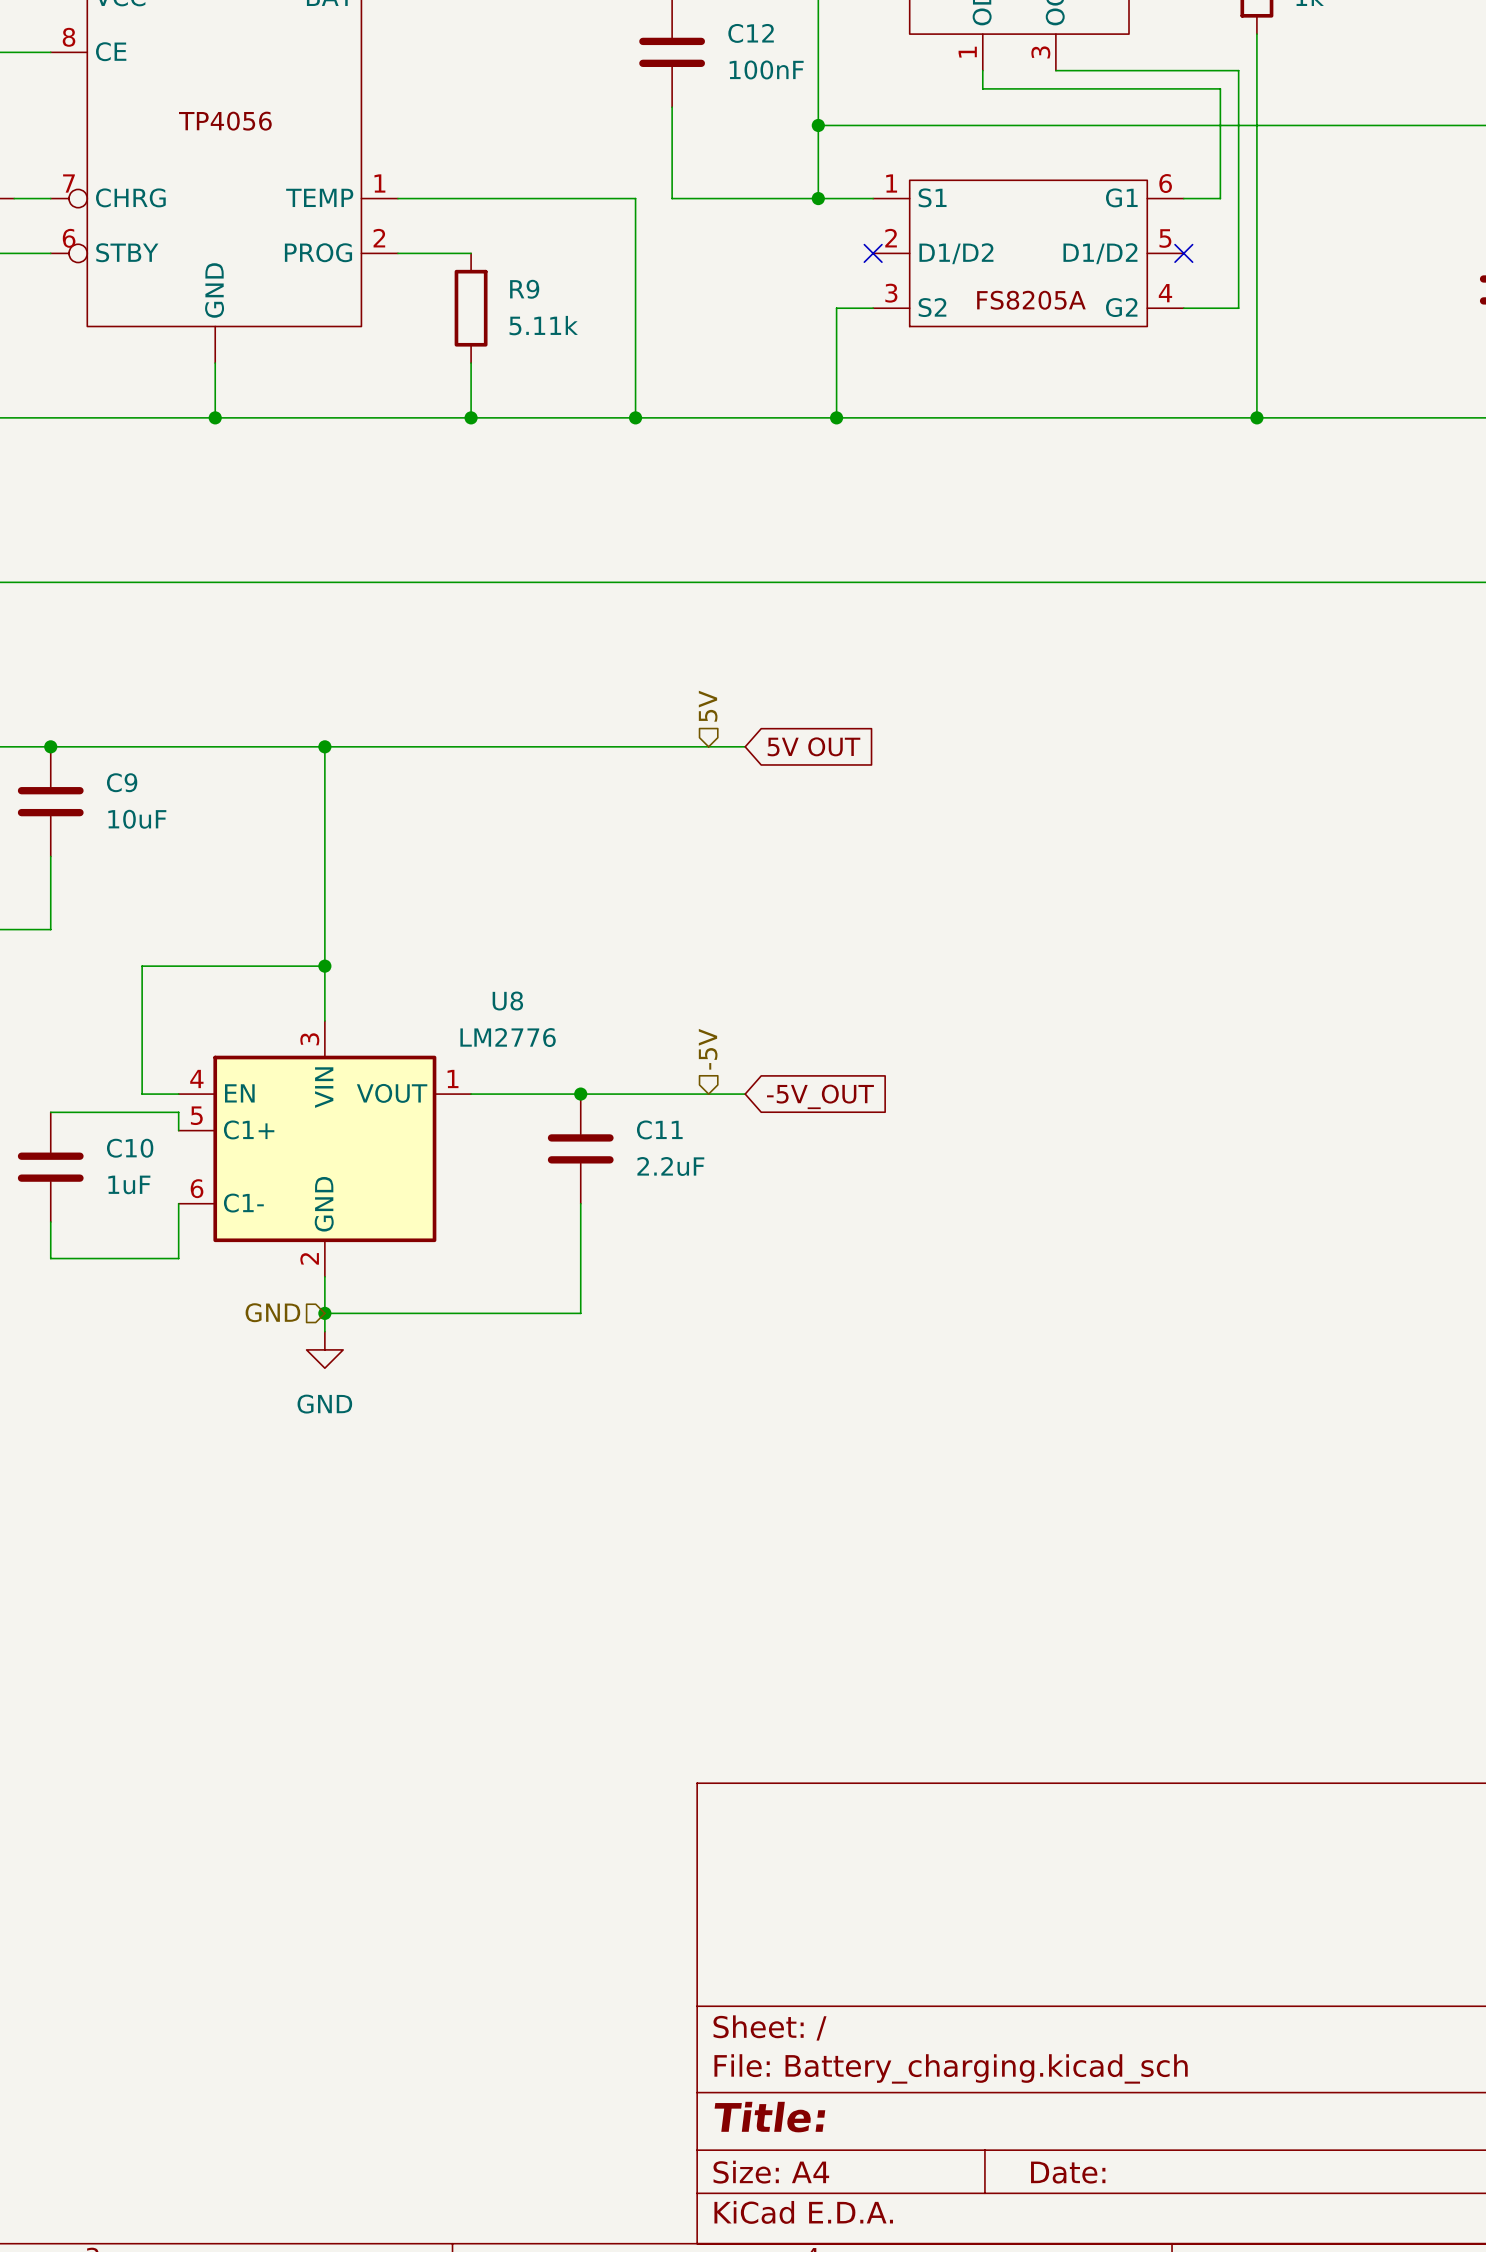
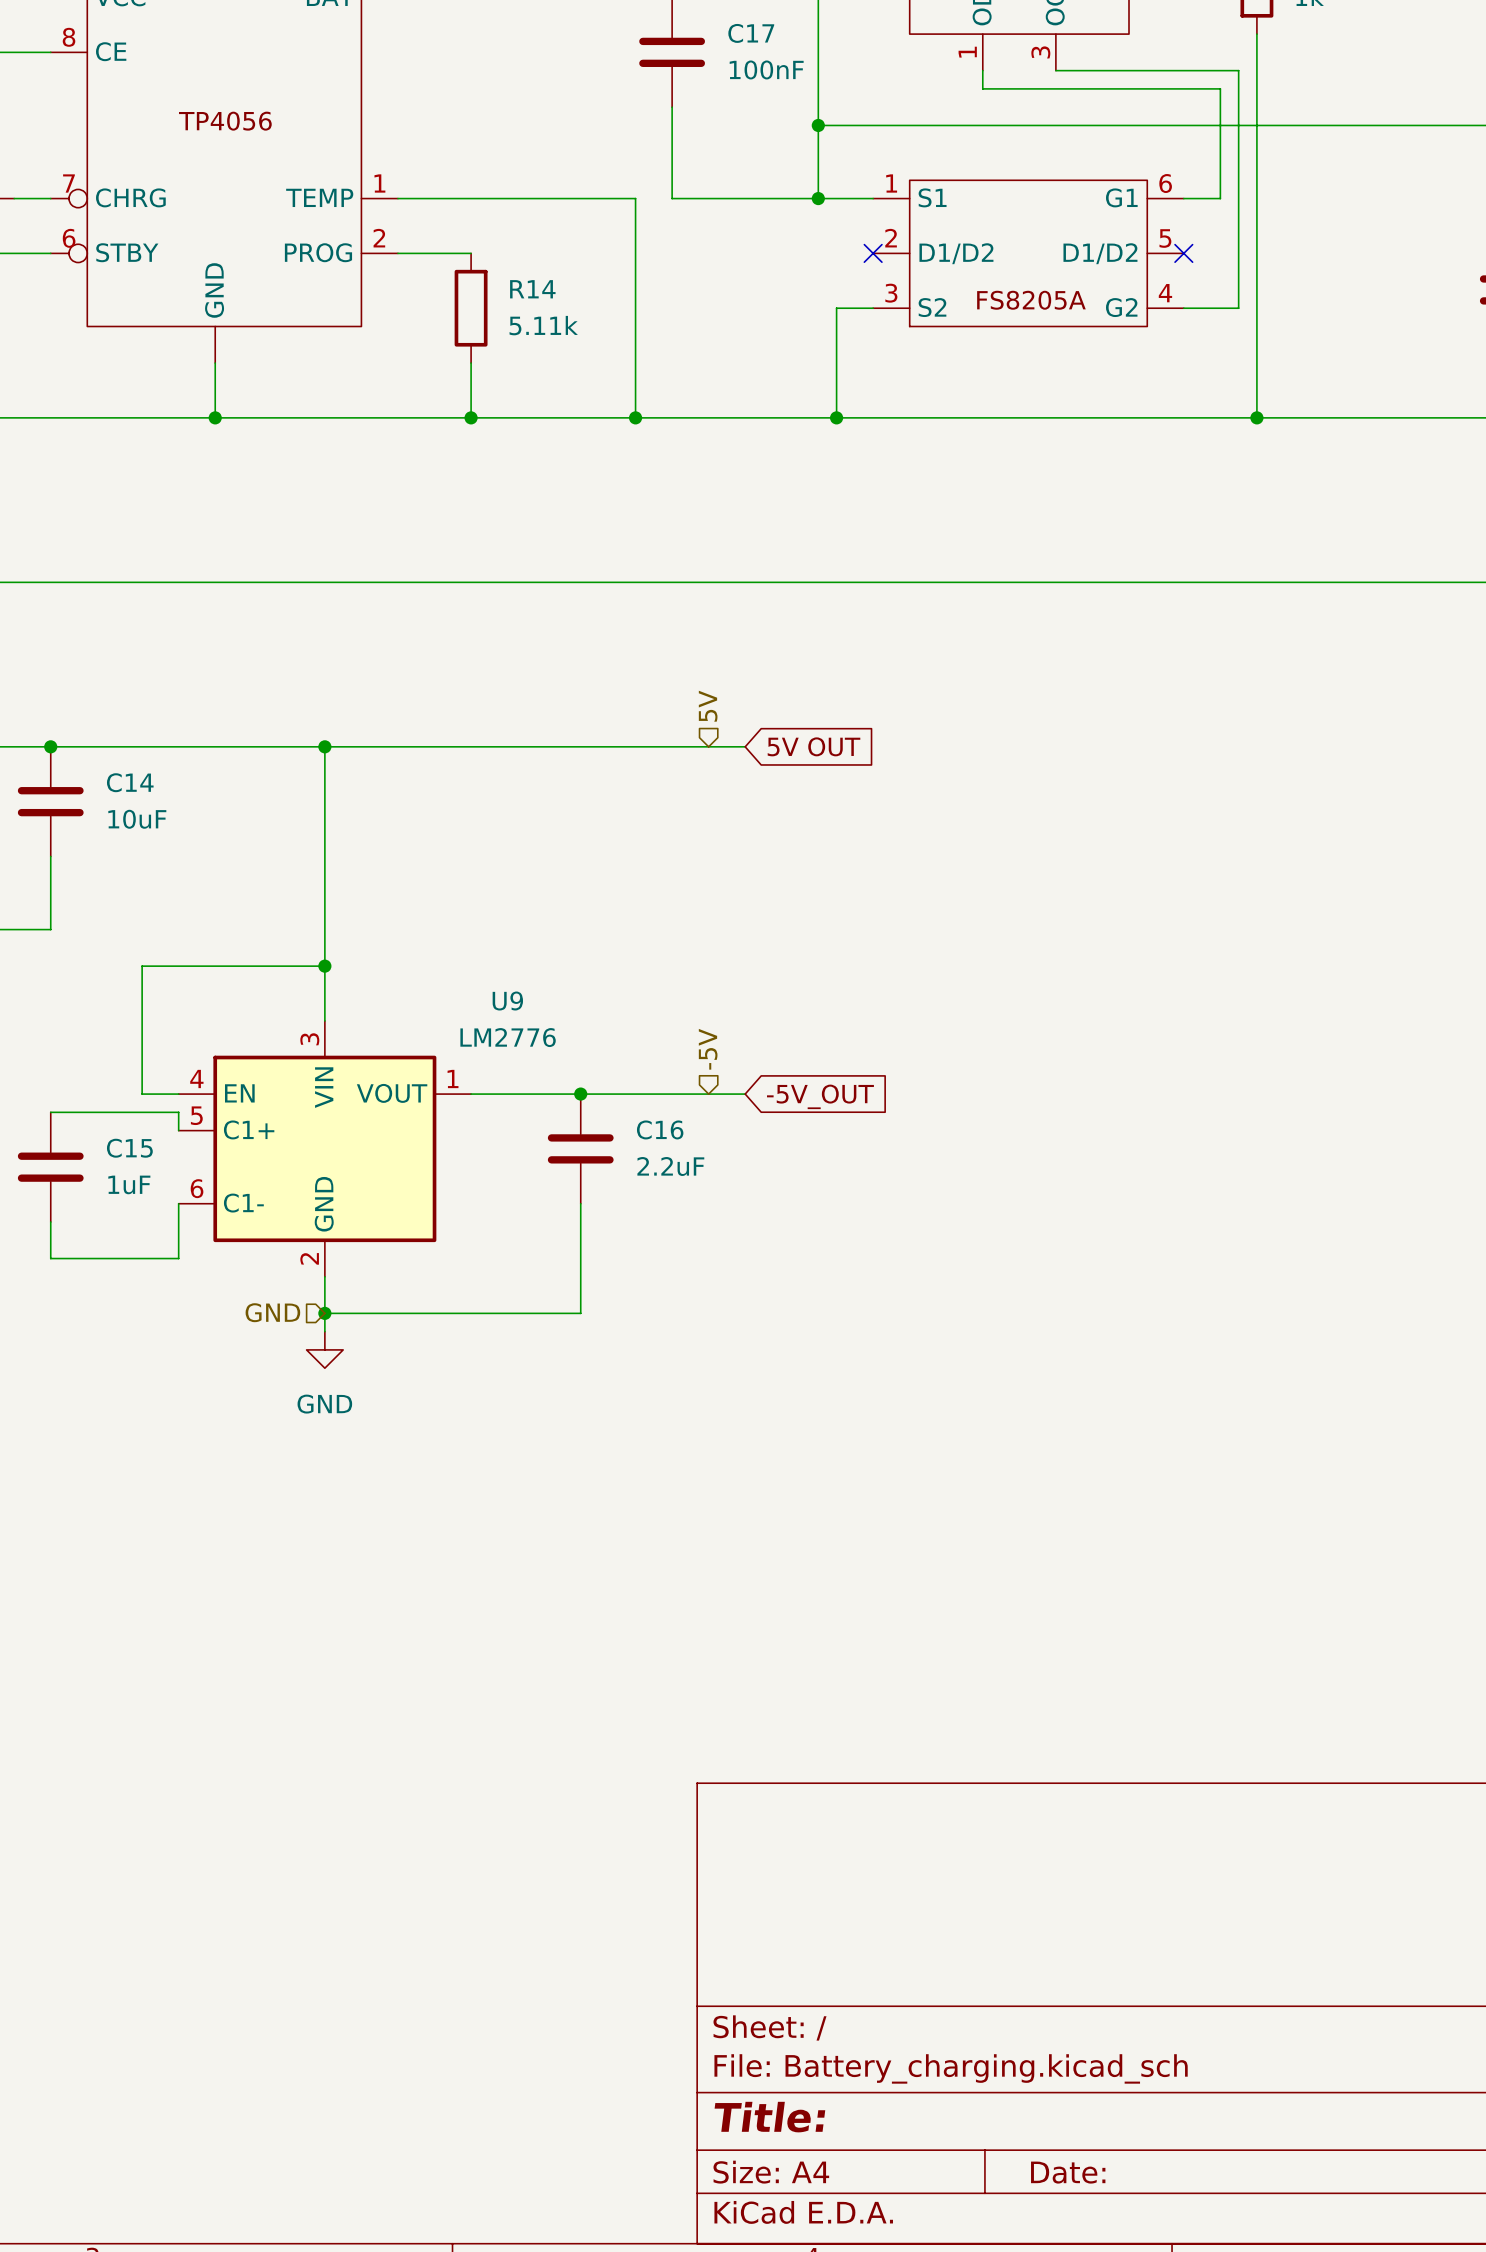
C12 name: C12 (751, 33) -> C17 (751, 33)
R9 name: R9 (524, 289) -> R14 (532, 289)
C9 name: C9 (122, 782) -> C14 (130, 782)
U8 name: U8 (507, 1001) -> U9 (507, 1001)
C11 name: C11 (659, 1129) -> C16 (660, 1129)
C10 name: C10 (130, 1148) -> C15 (129, 1148)

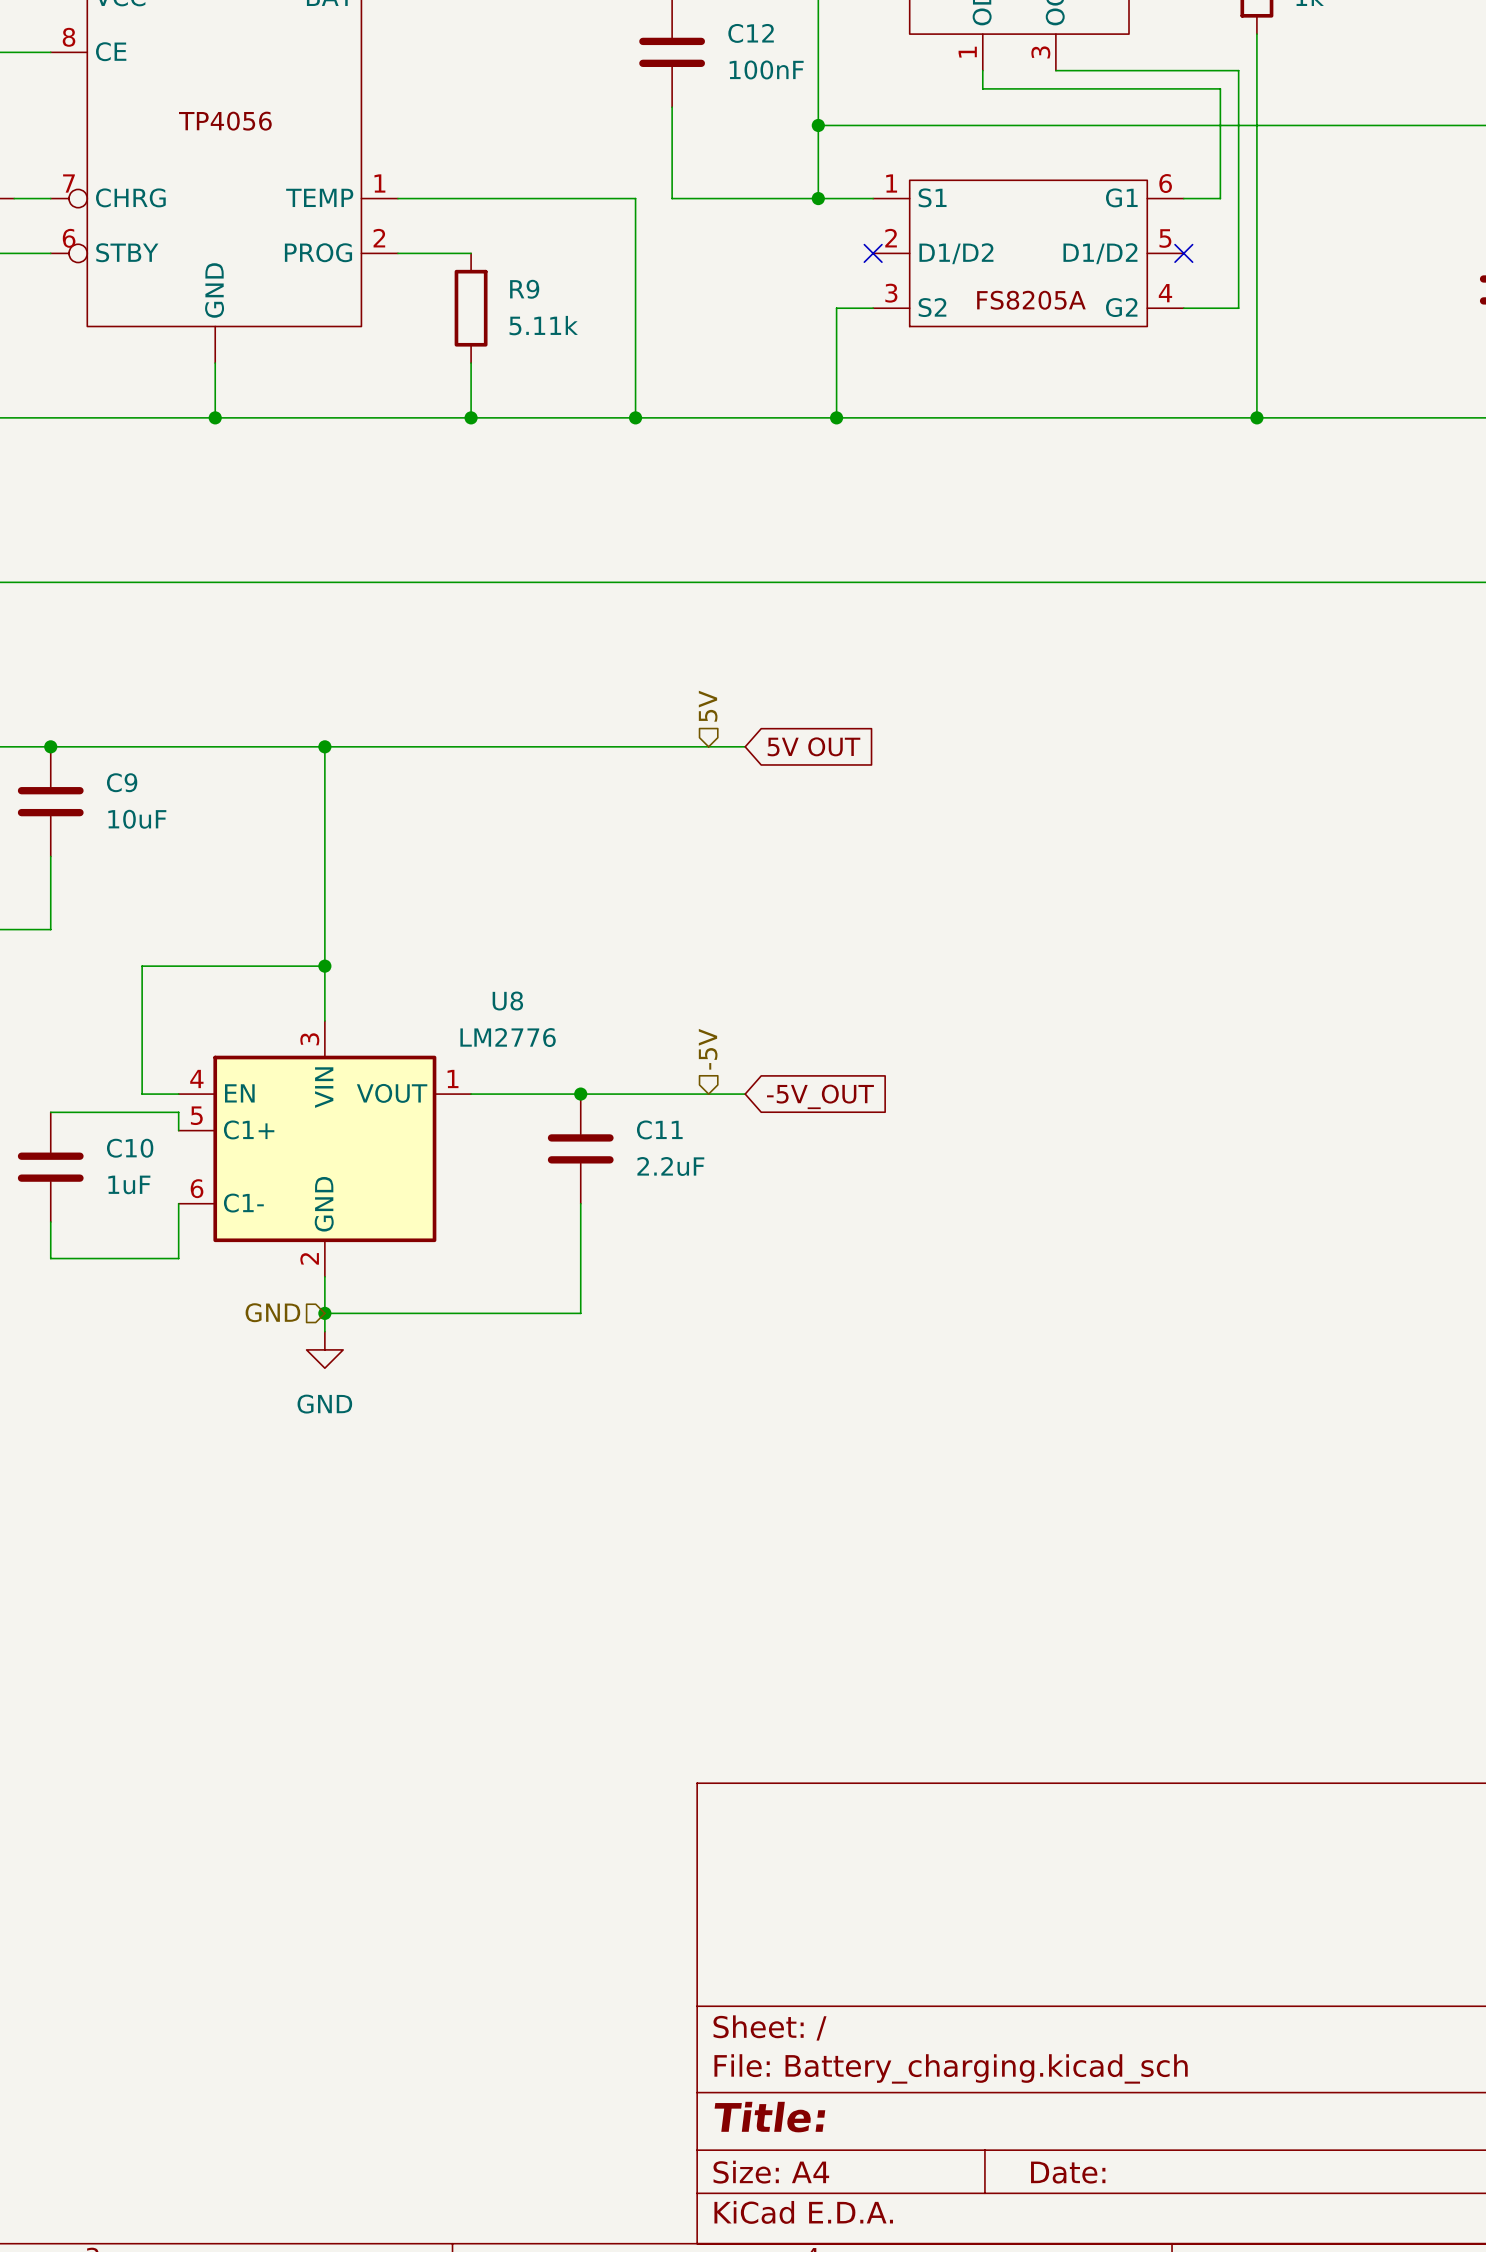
C17 name: C17 (751, 33) -> C12 (751, 33)
R14 name: R14 (532, 289) -> R9 (524, 289)
C14 name: C14 (130, 782) -> C9 (122, 782)
U9 name: U9 (507, 1001) -> U8 (507, 1001)
C16 name: C16 (660, 1129) -> C11 (659, 1129)
C15 name: C15 (129, 1148) -> C10 (130, 1148)

